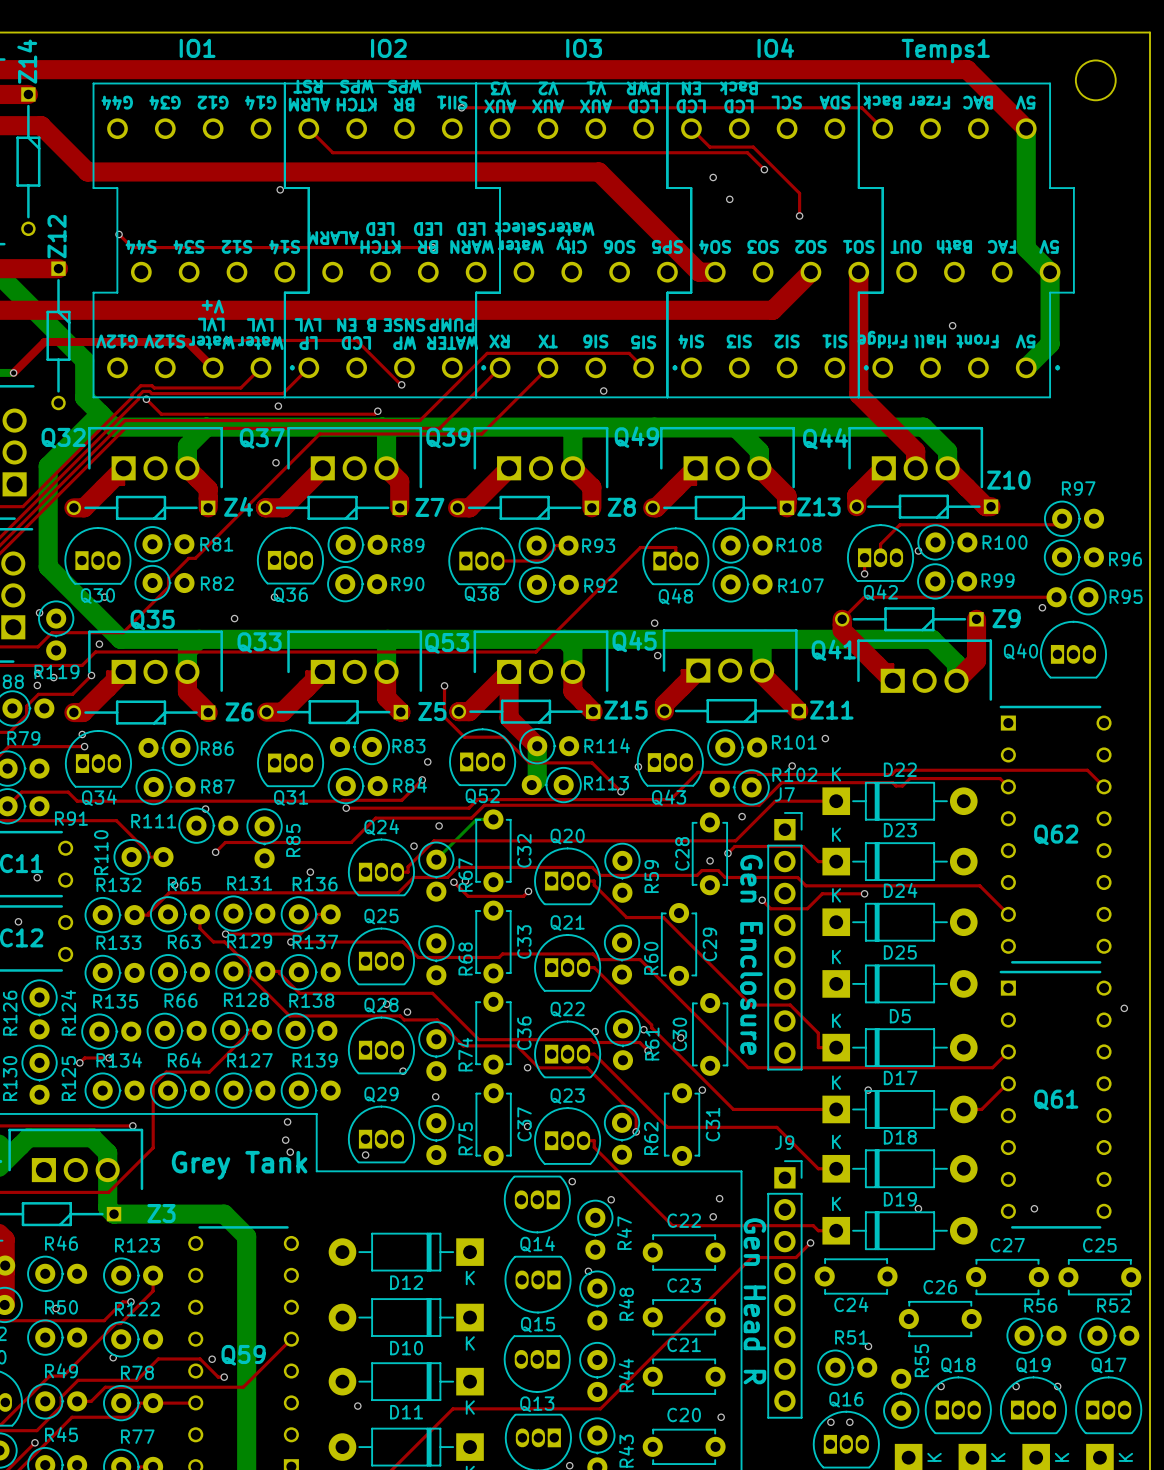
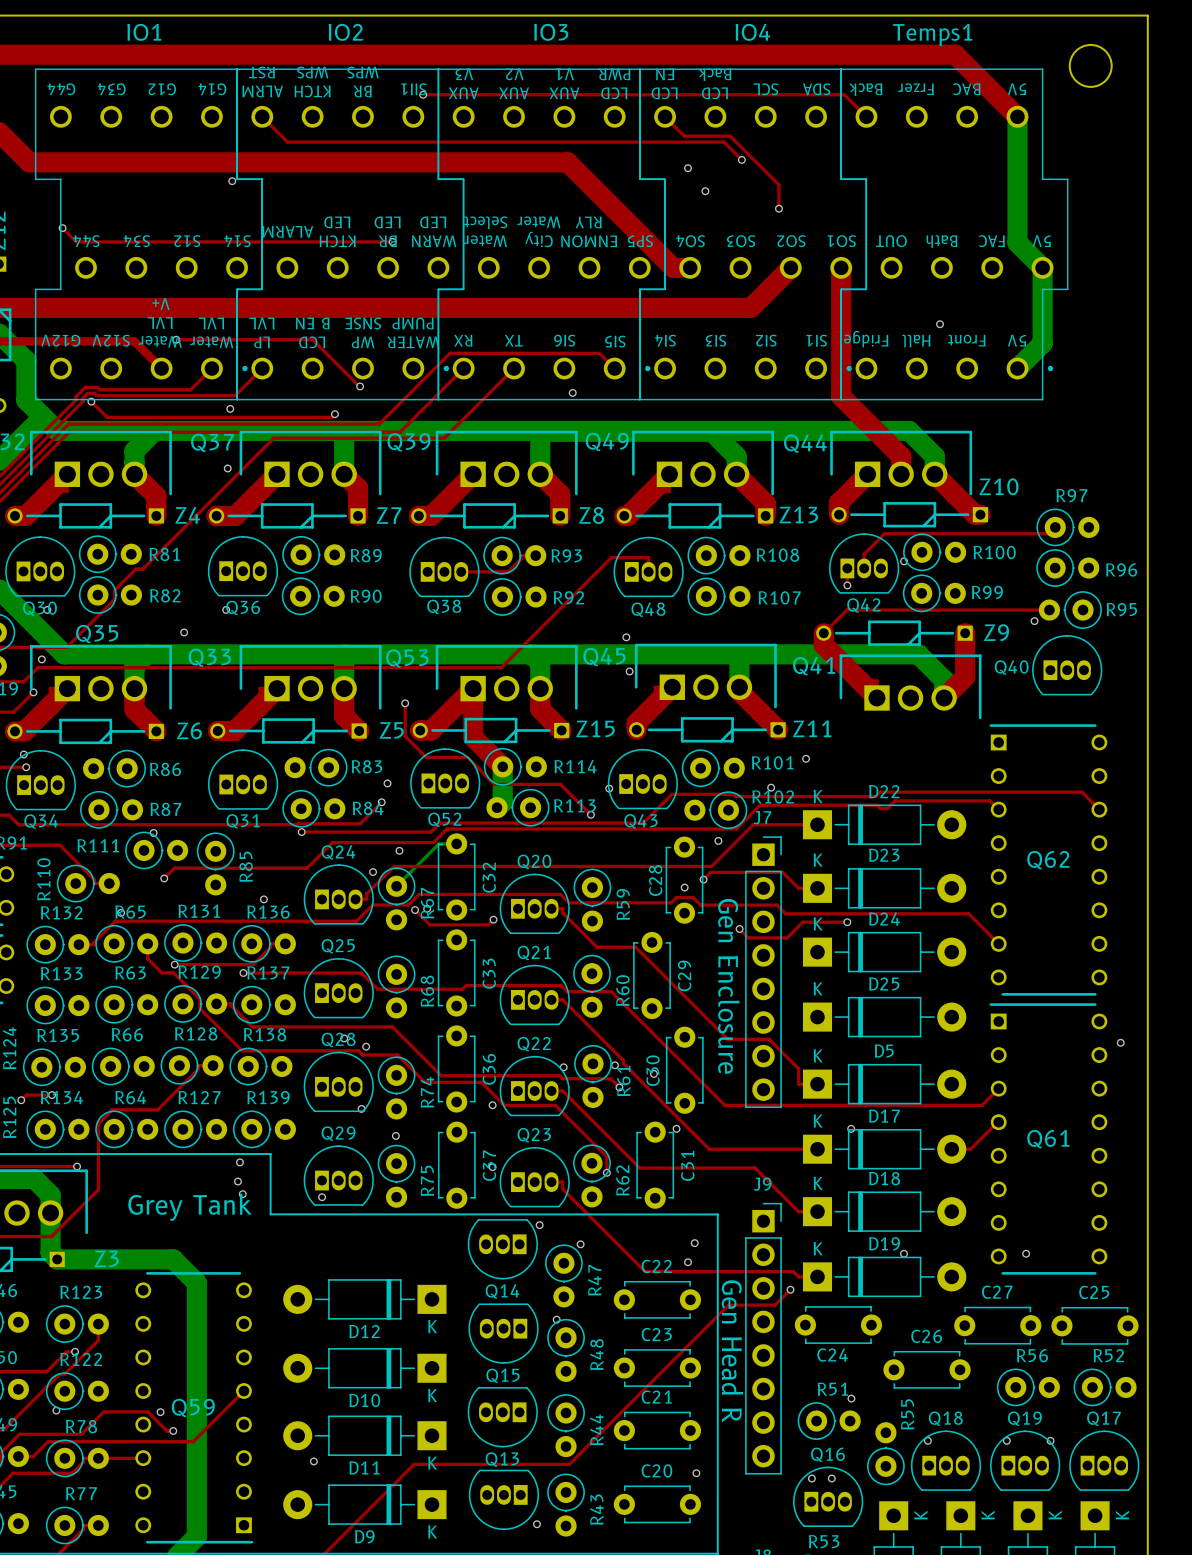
text: none -> RLY (588, 222)
text: SO6 (619, 246) -> ENMON (589, 241)

